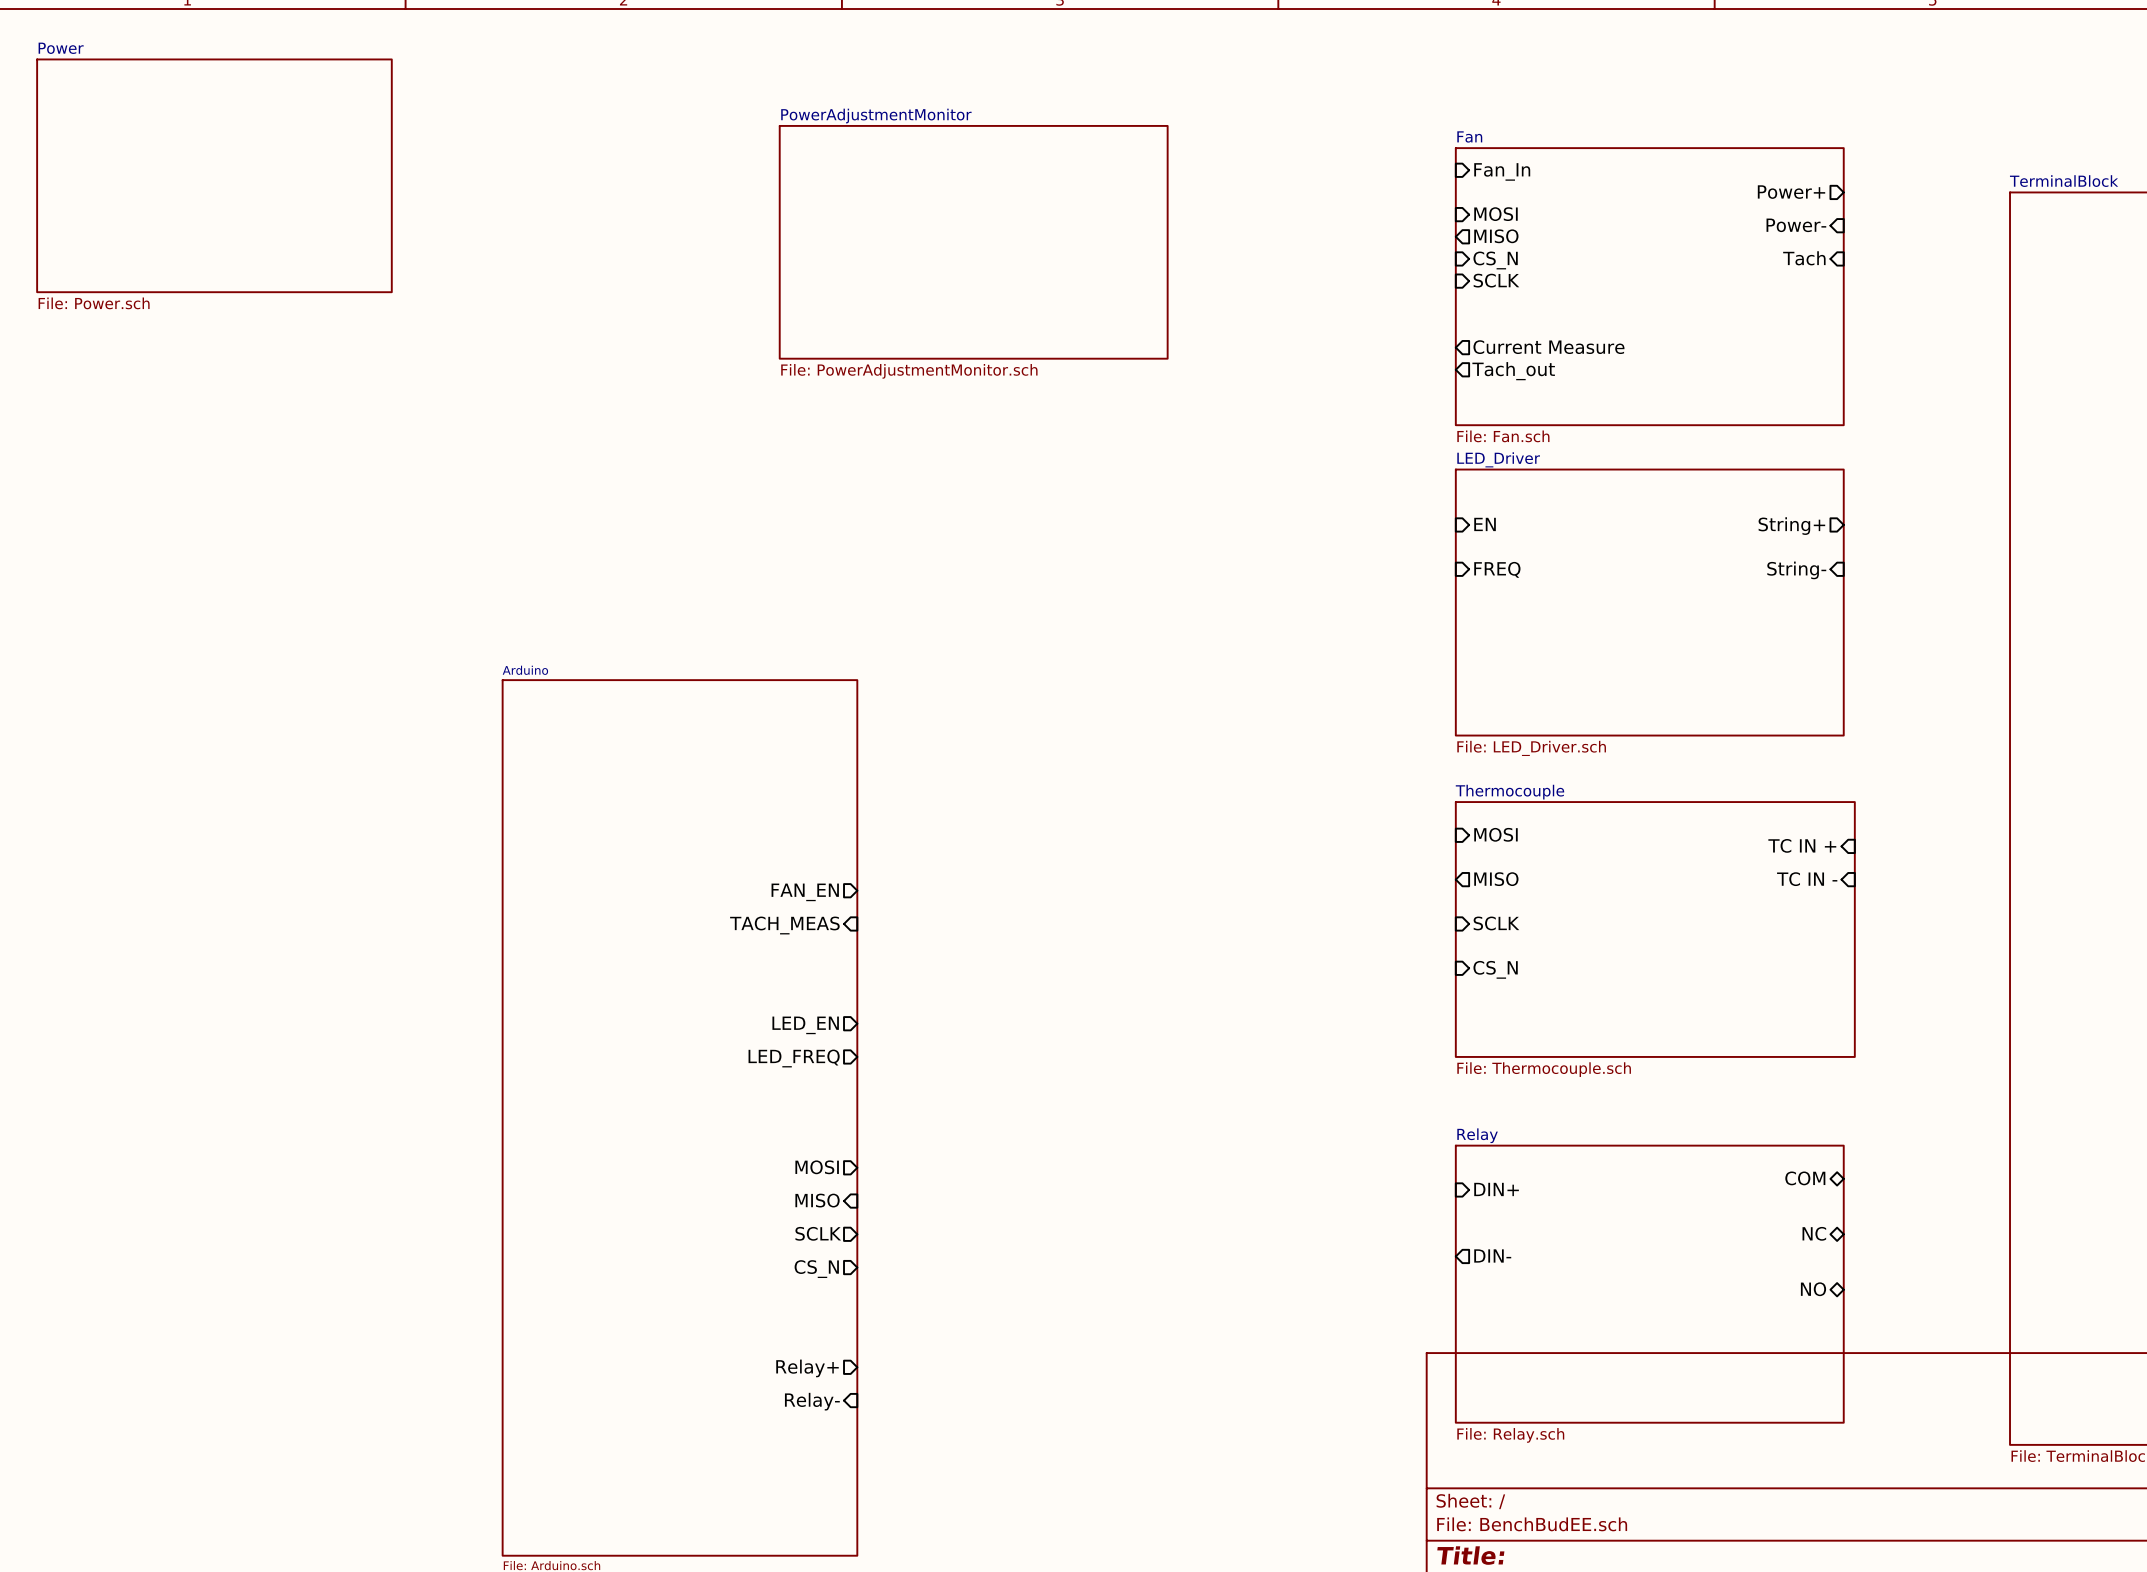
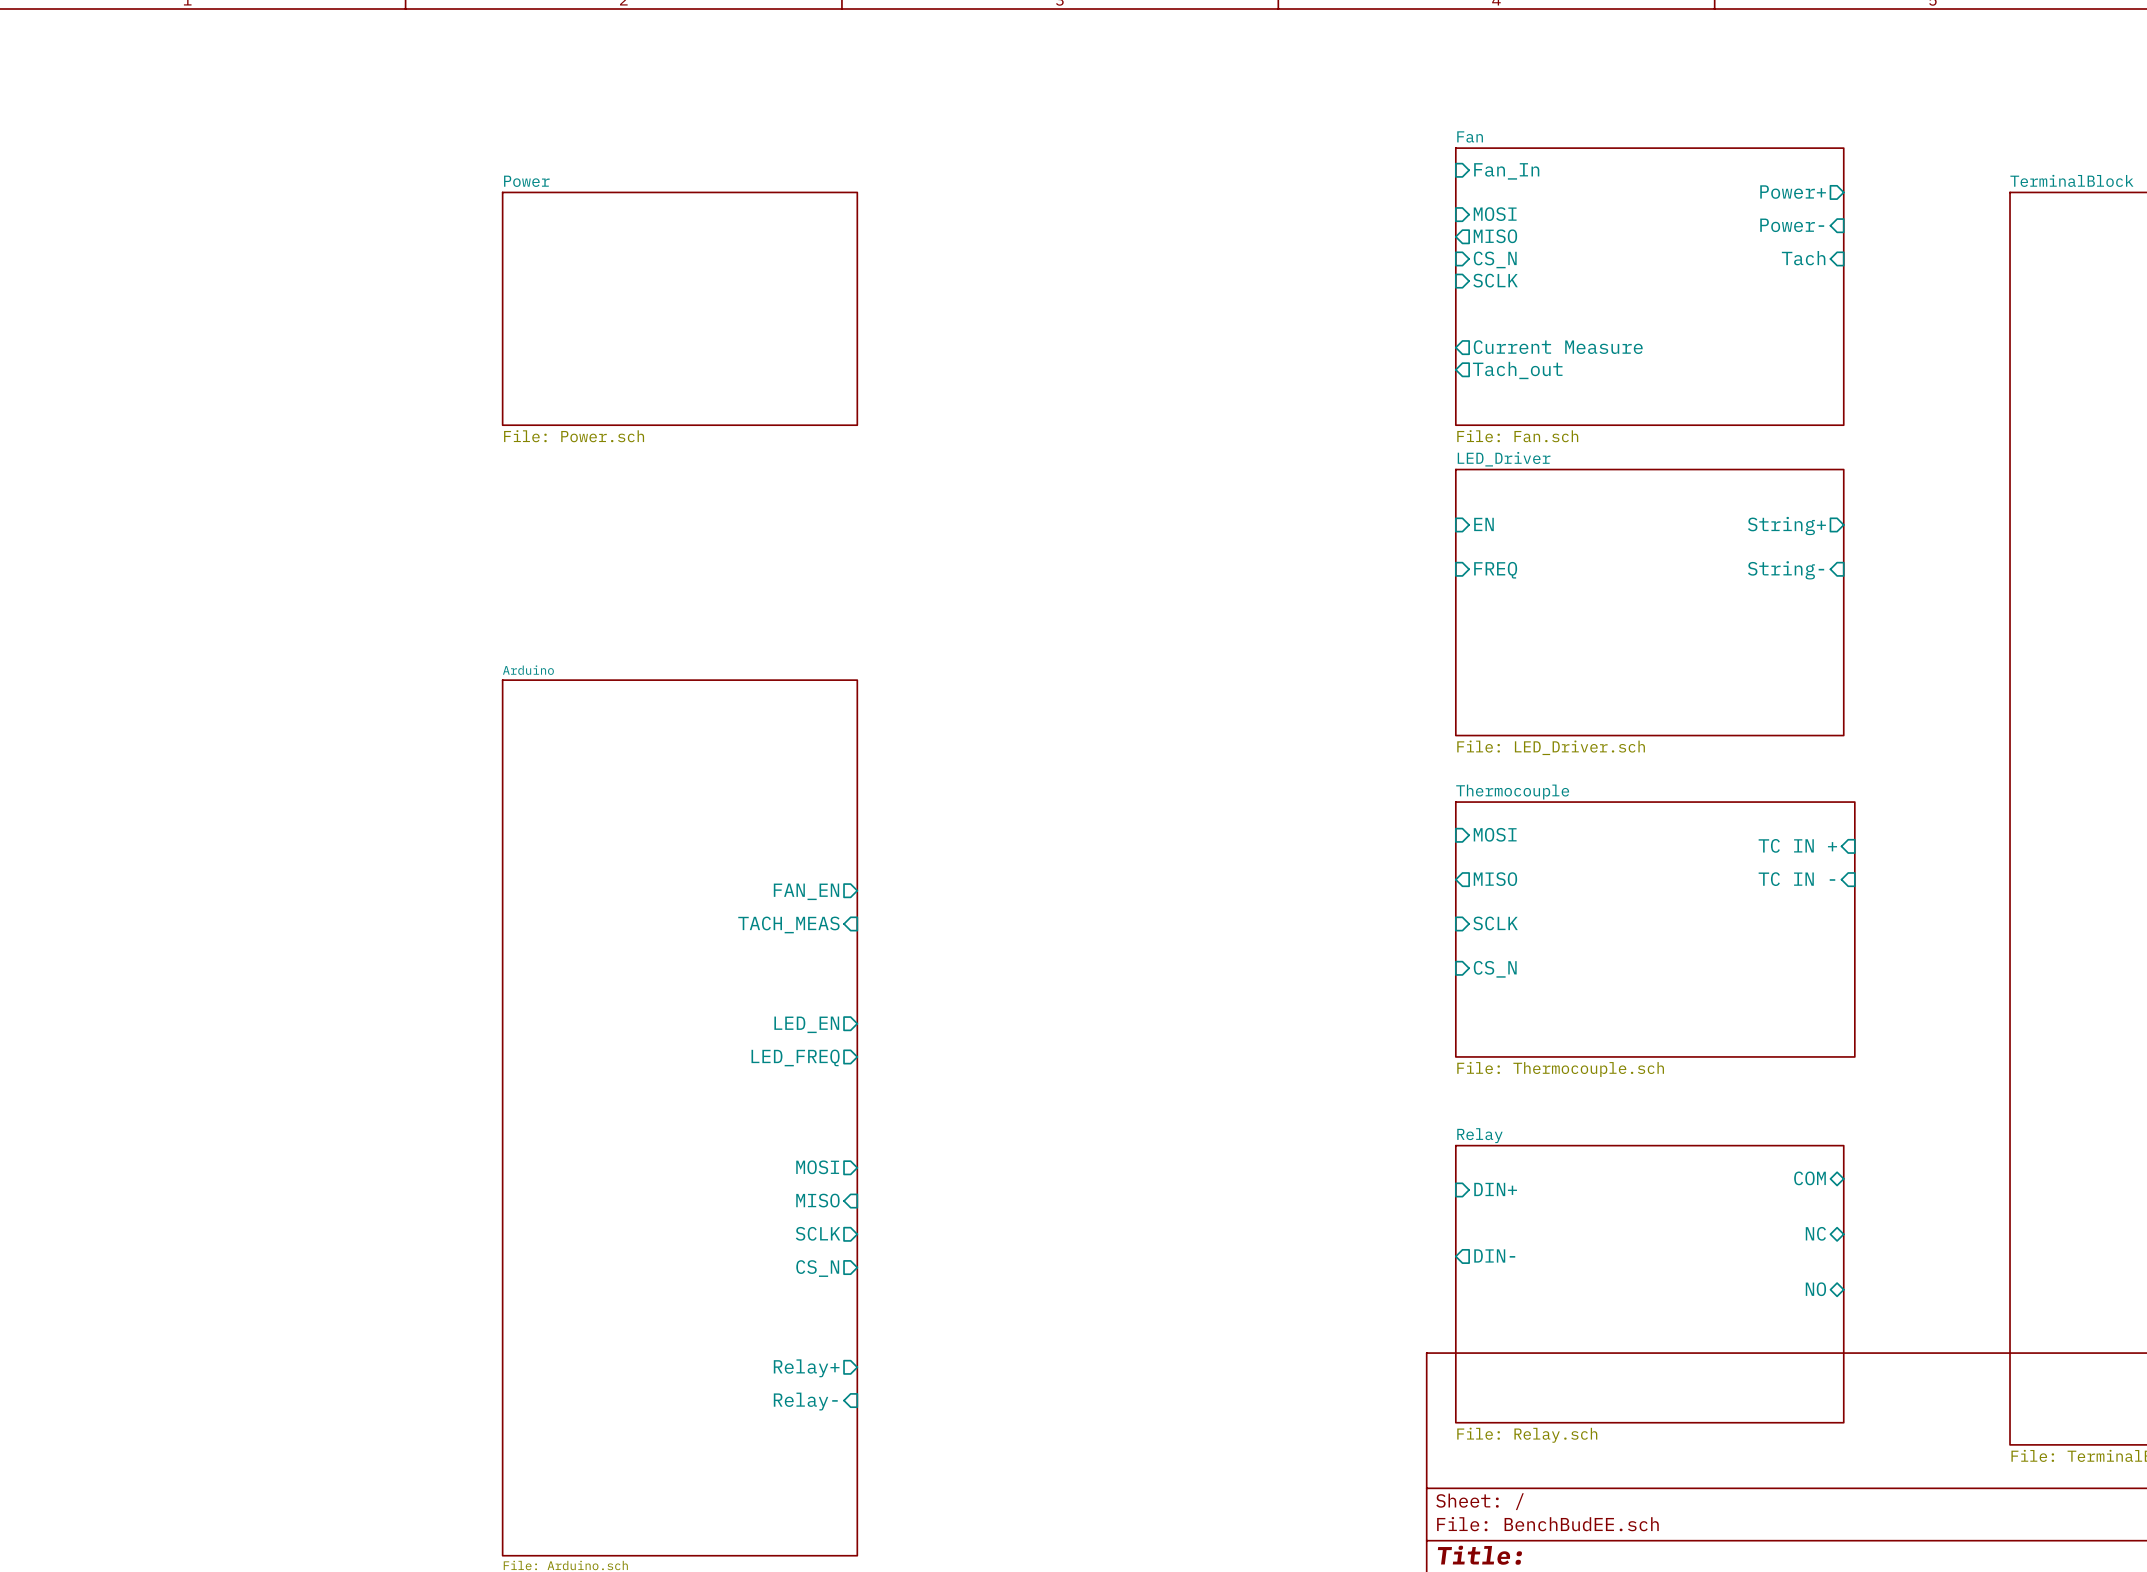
sheet Power: File: Power.sch (214, 175) -> none
sheet PowerAdjustmentMonitor: File: PowerAdjustmentMonitor.sch (973, 242) -> none
sheet Power: none -> File: Power.sch (679, 308)

